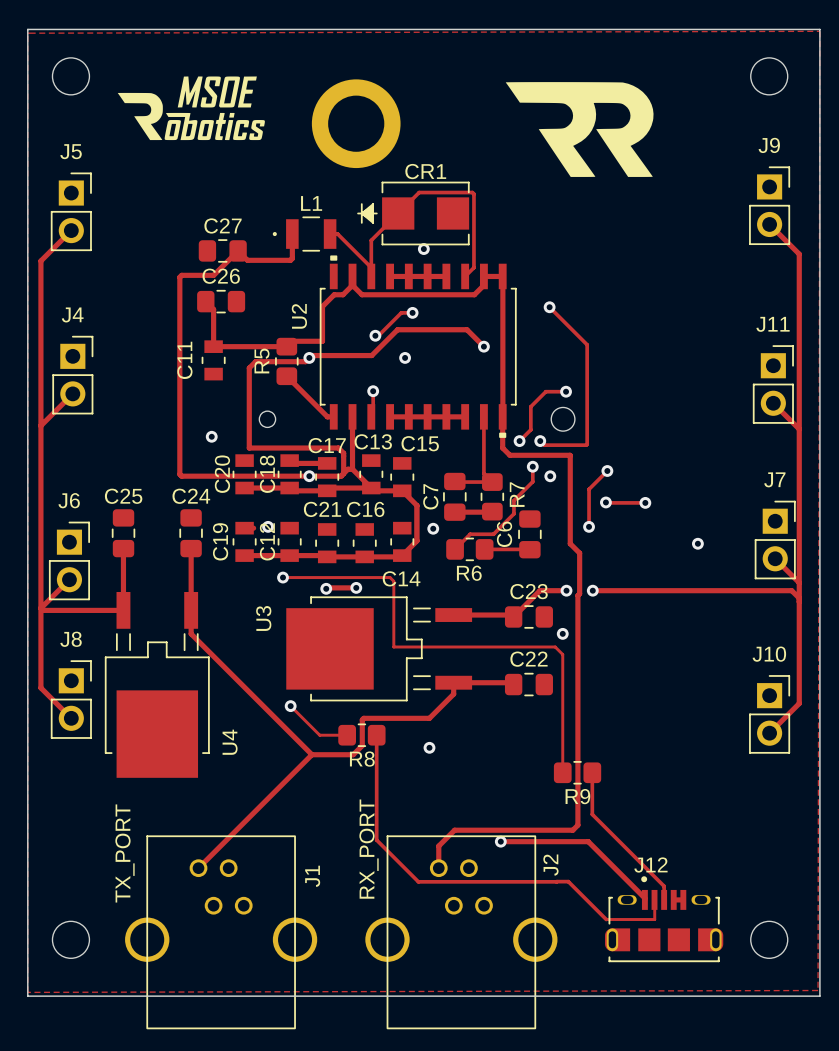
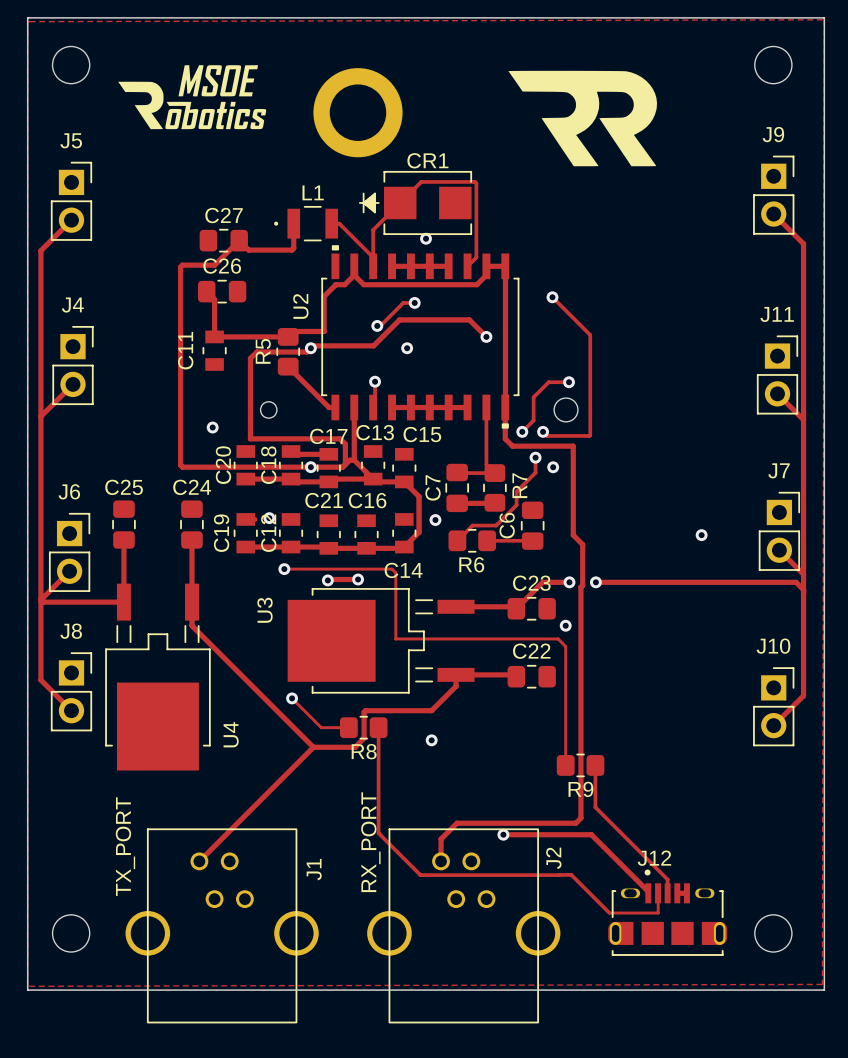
track: (607, 470) (589, 489) (589, 526) -> none
via: (607, 470) -> none
track: (605, 502) (645, 502) -> none
via: (605, 502) -> none
via: (645, 502) -> none
via: (589, 526) -> none

